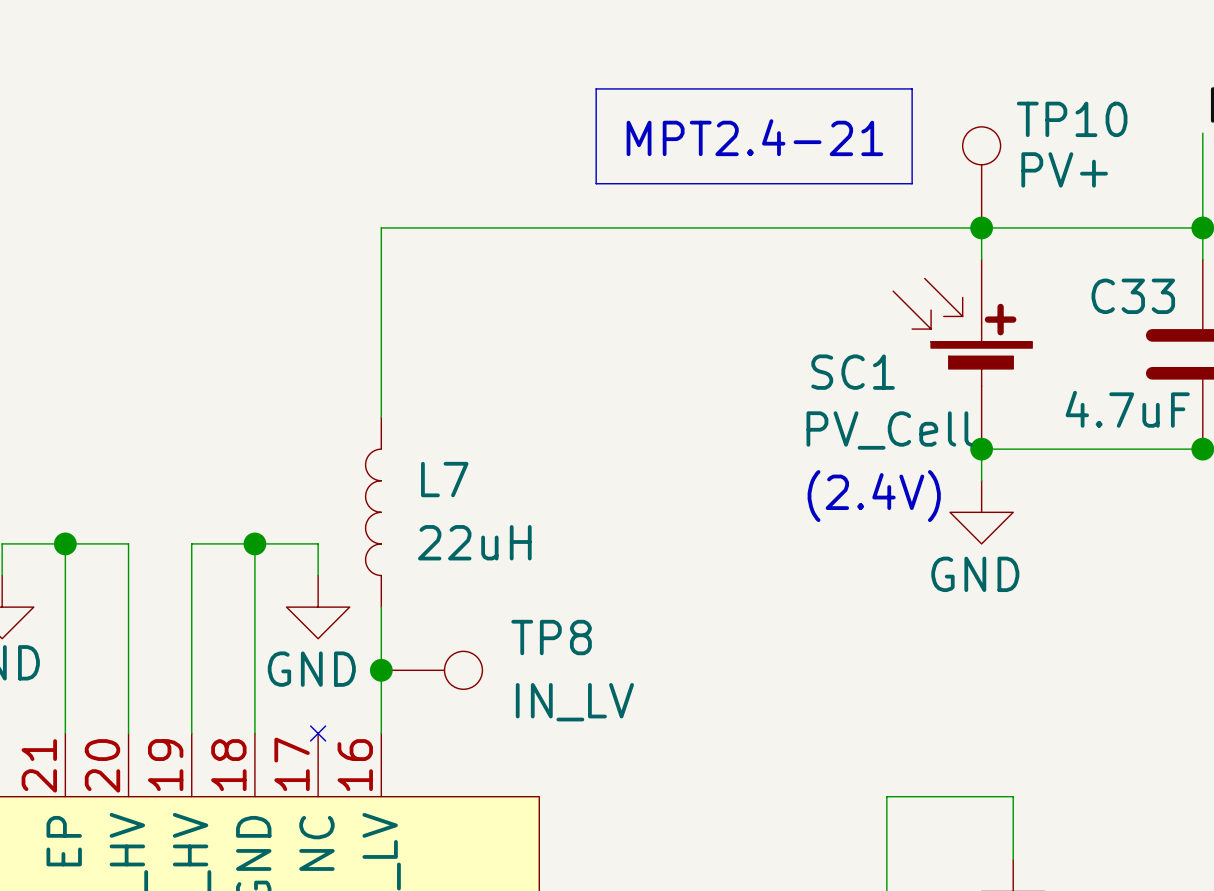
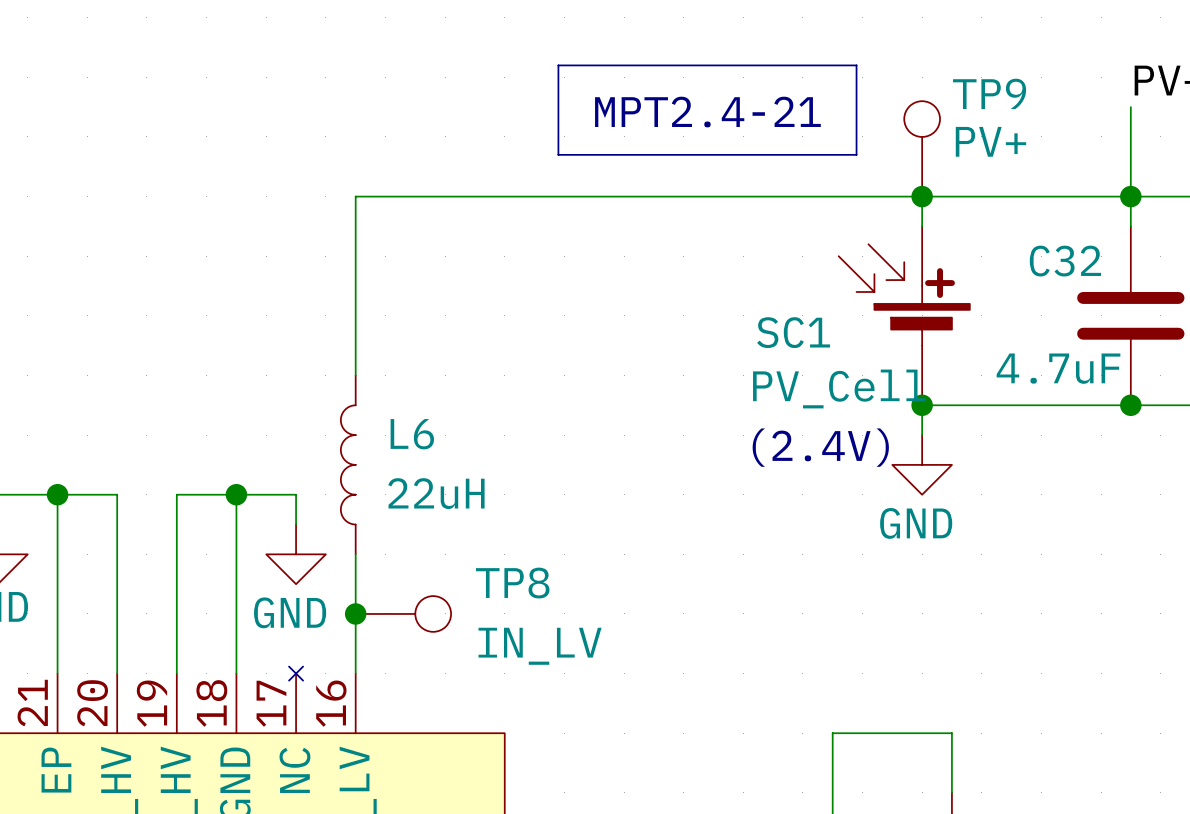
TP10 name: TP10 (1072, 119) -> TP9 (989, 93)
C33 name: C33 (1133, 296) -> C32 (1065, 261)
L7 name: L7 (444, 479) -> L6 (412, 434)

